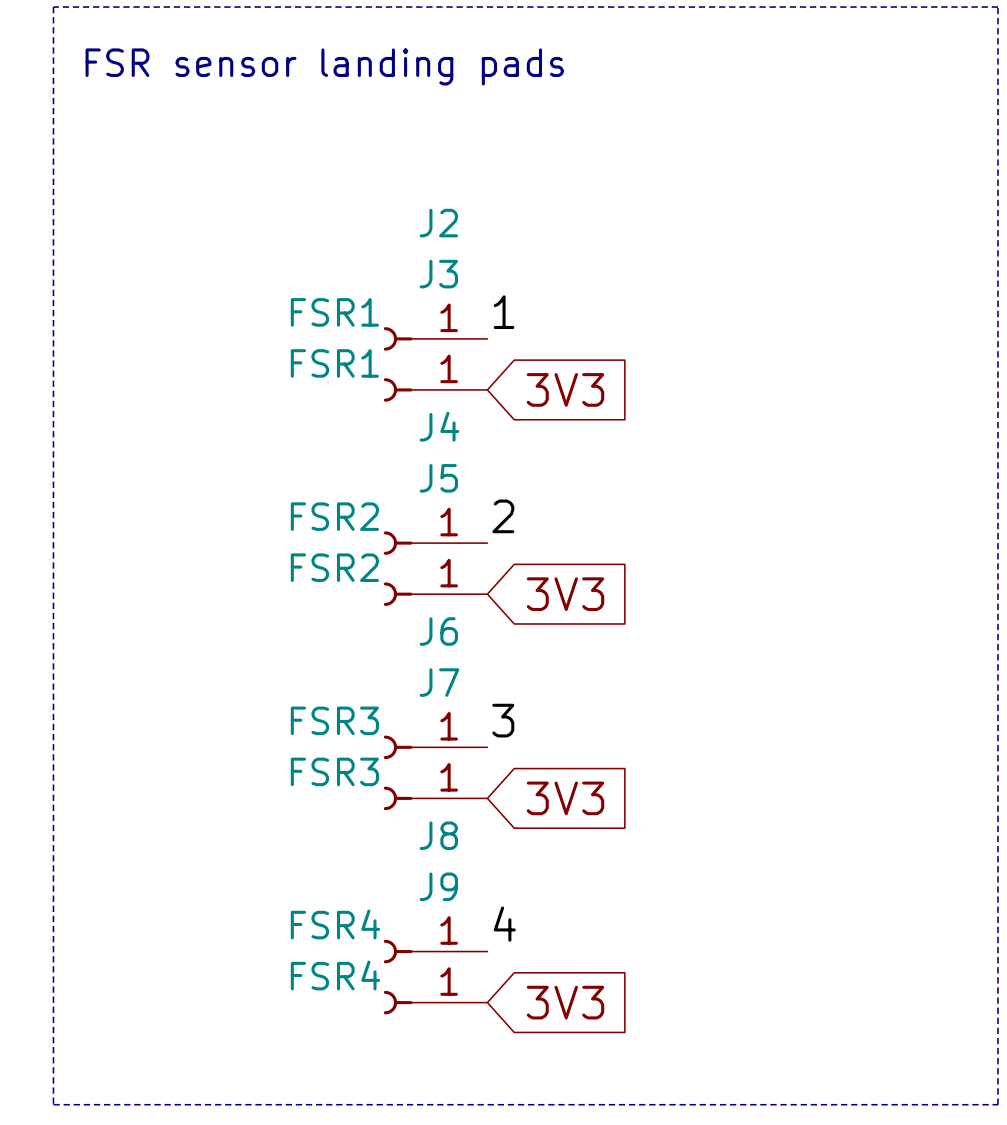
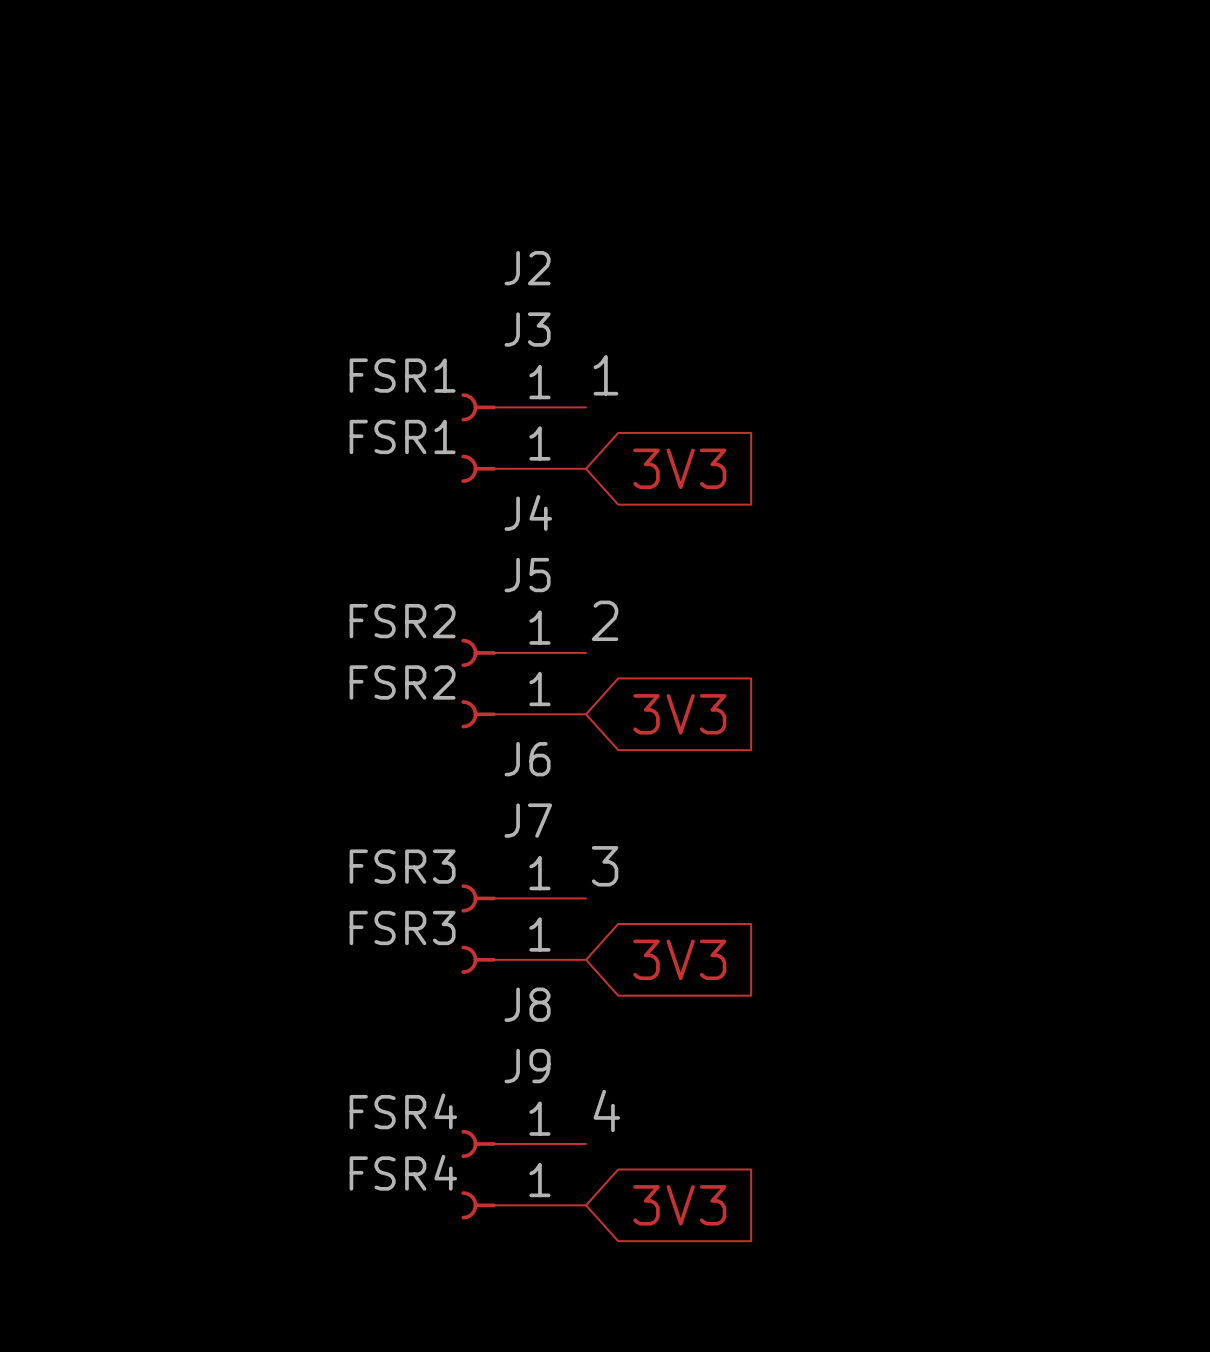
line: (53, 7) (997, 7) (997, 1104) (53, 1104) (53, 7) -> none
text: FSR sensor landing pads (324, 66) -> none

